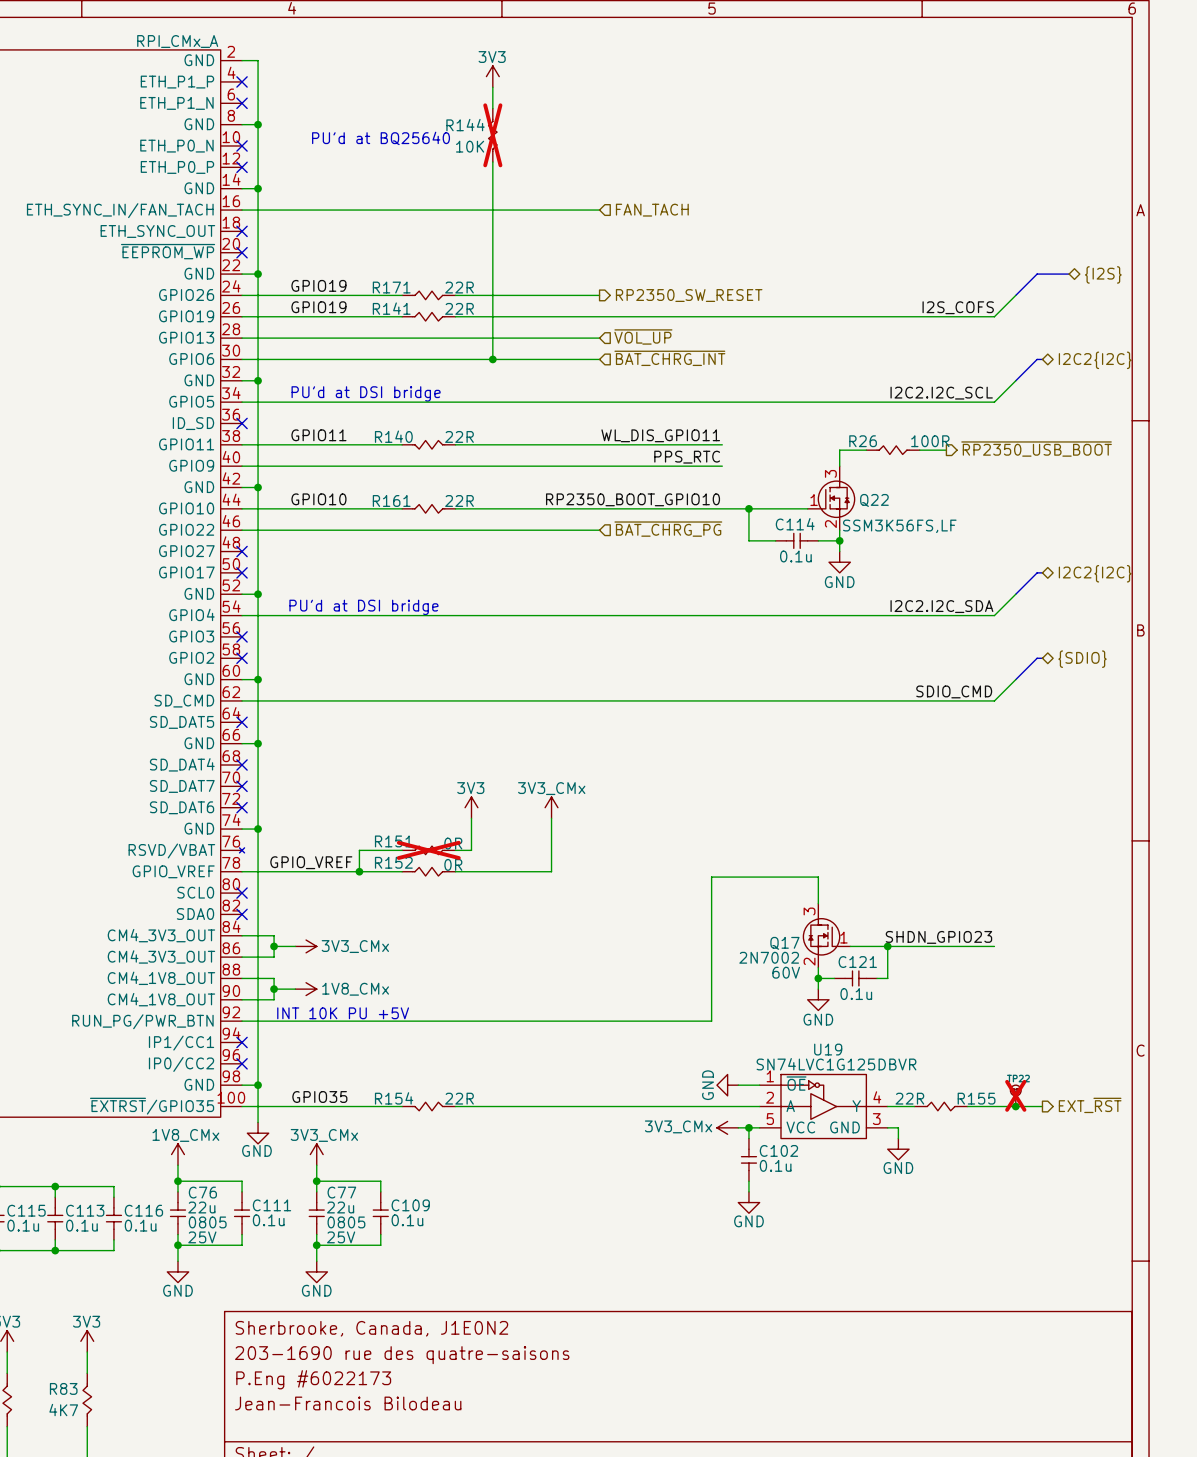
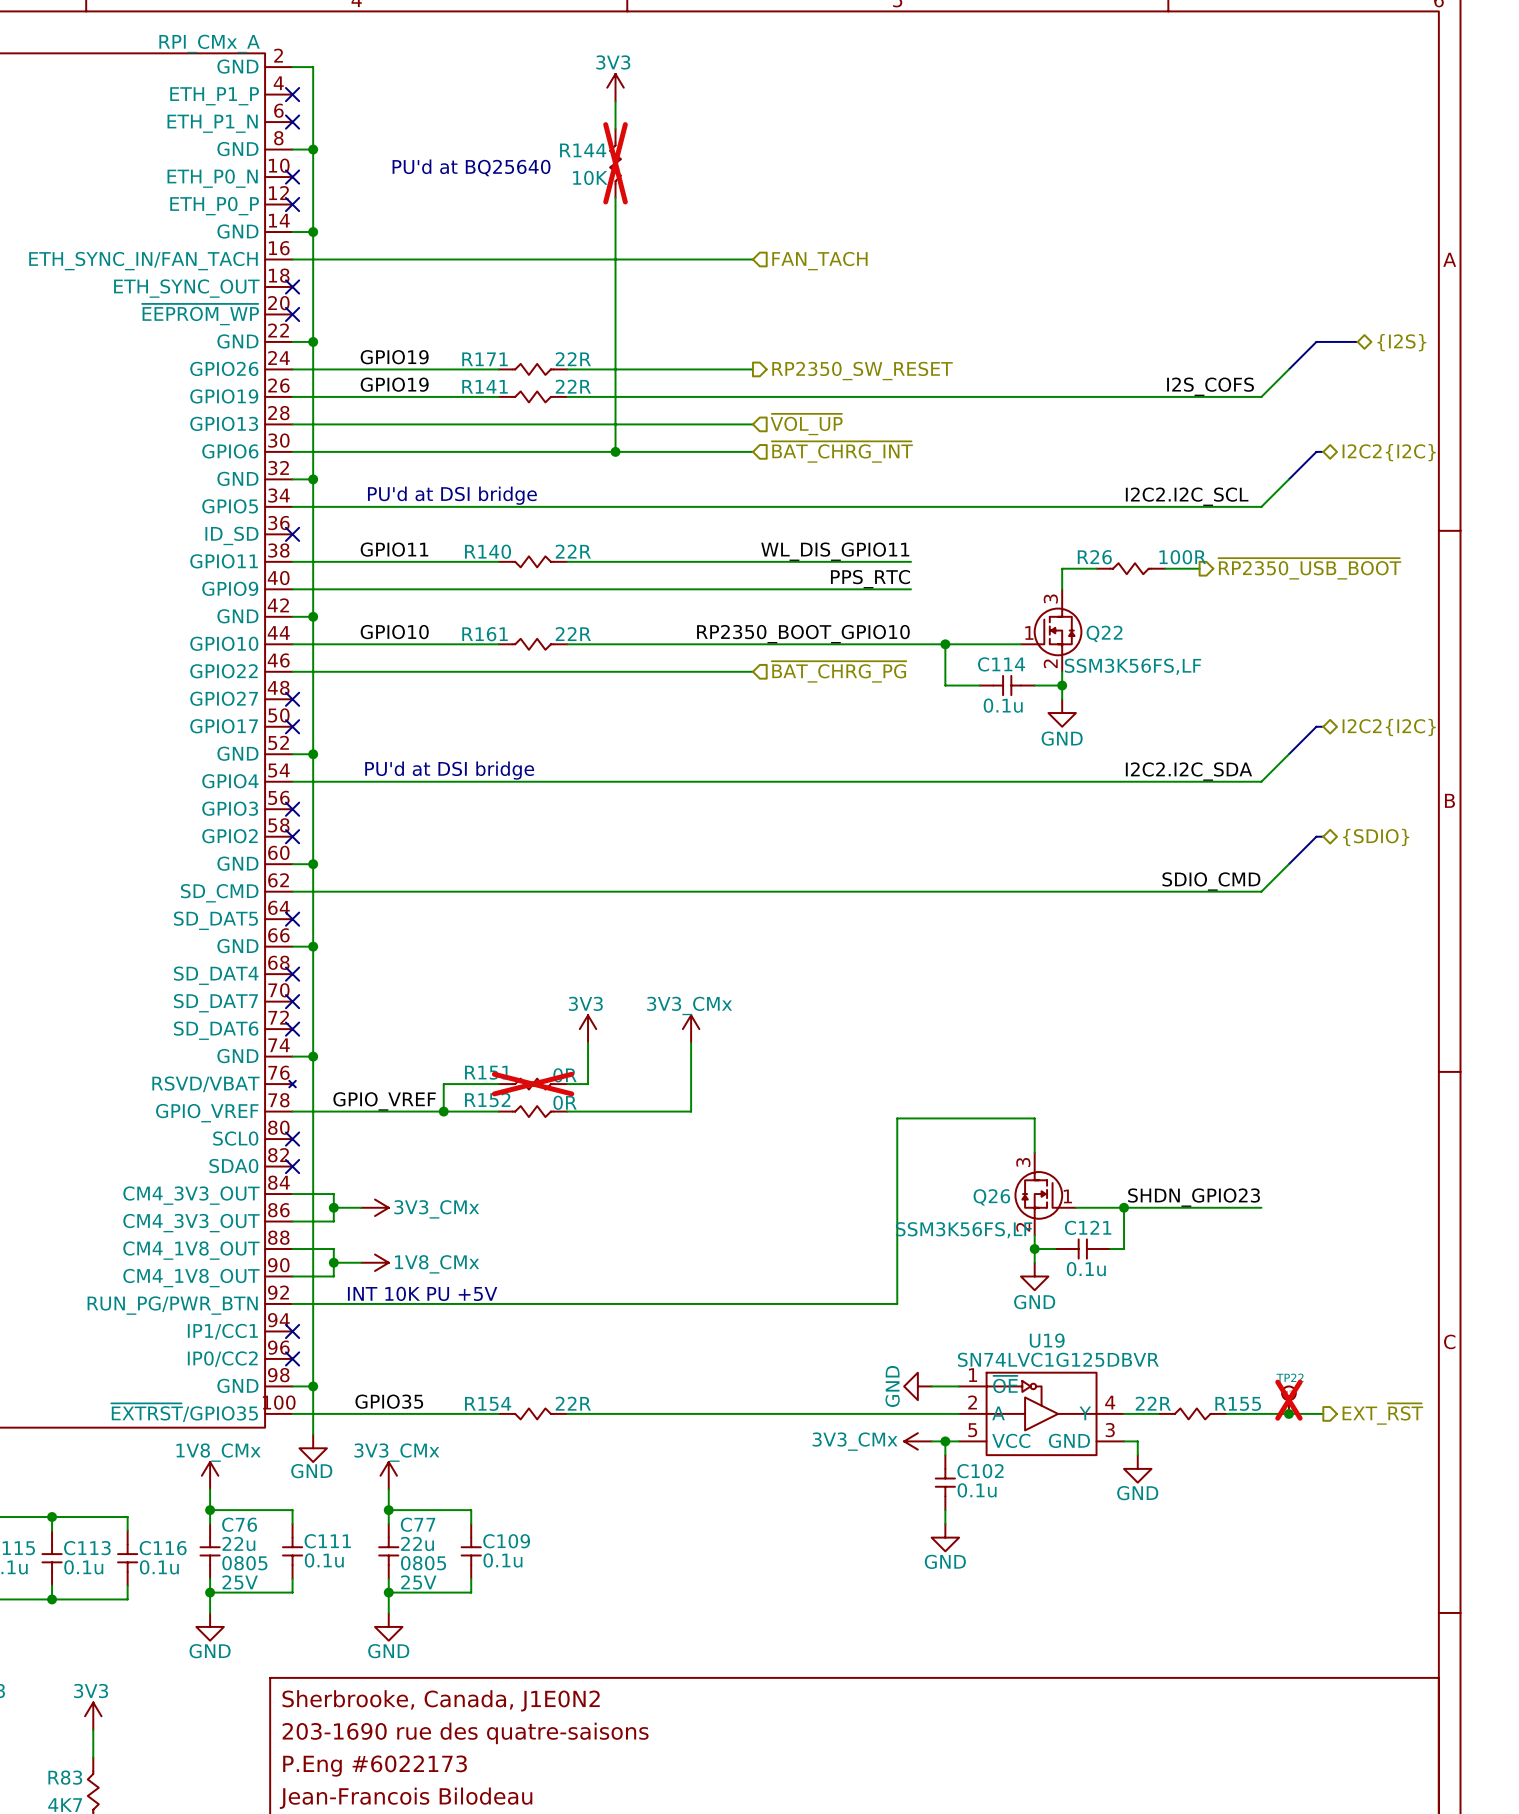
Q17 name: Q17 (784, 943) -> Q26 (991, 1197)
Q17 value: 2N7002 (769, 957) -> SSM3K56FS,LF (964, 1230)
Q17 text: 60V (786, 972) -> none

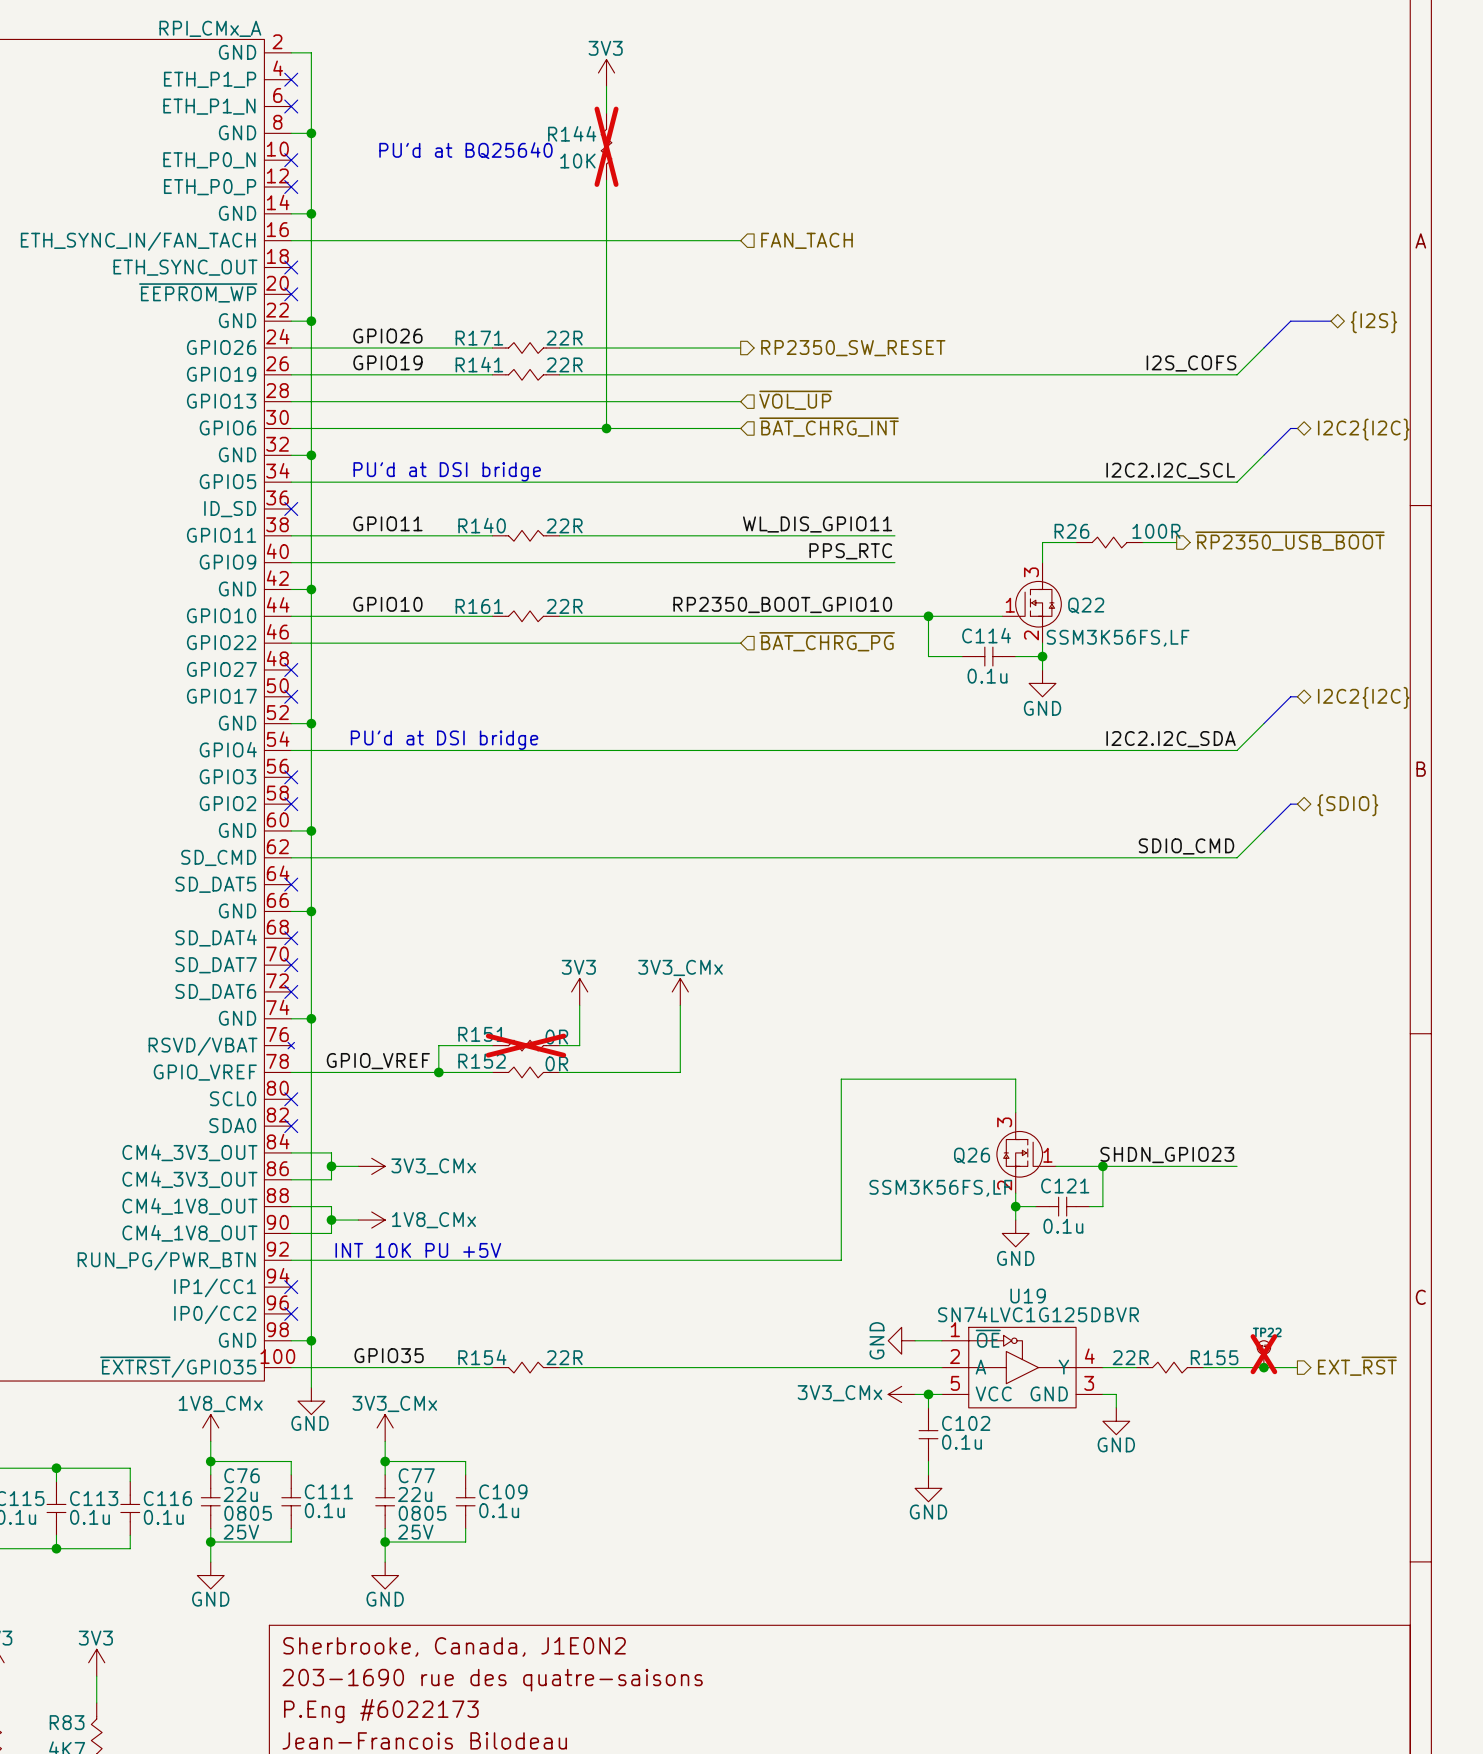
label: GPIO19 (394, 357) -> GPIO26 (387, 336)
wire: (897, 1118) (897, 1303) (856, 1303) -> (881, 1079) (841, 1079) (841, 1260)

